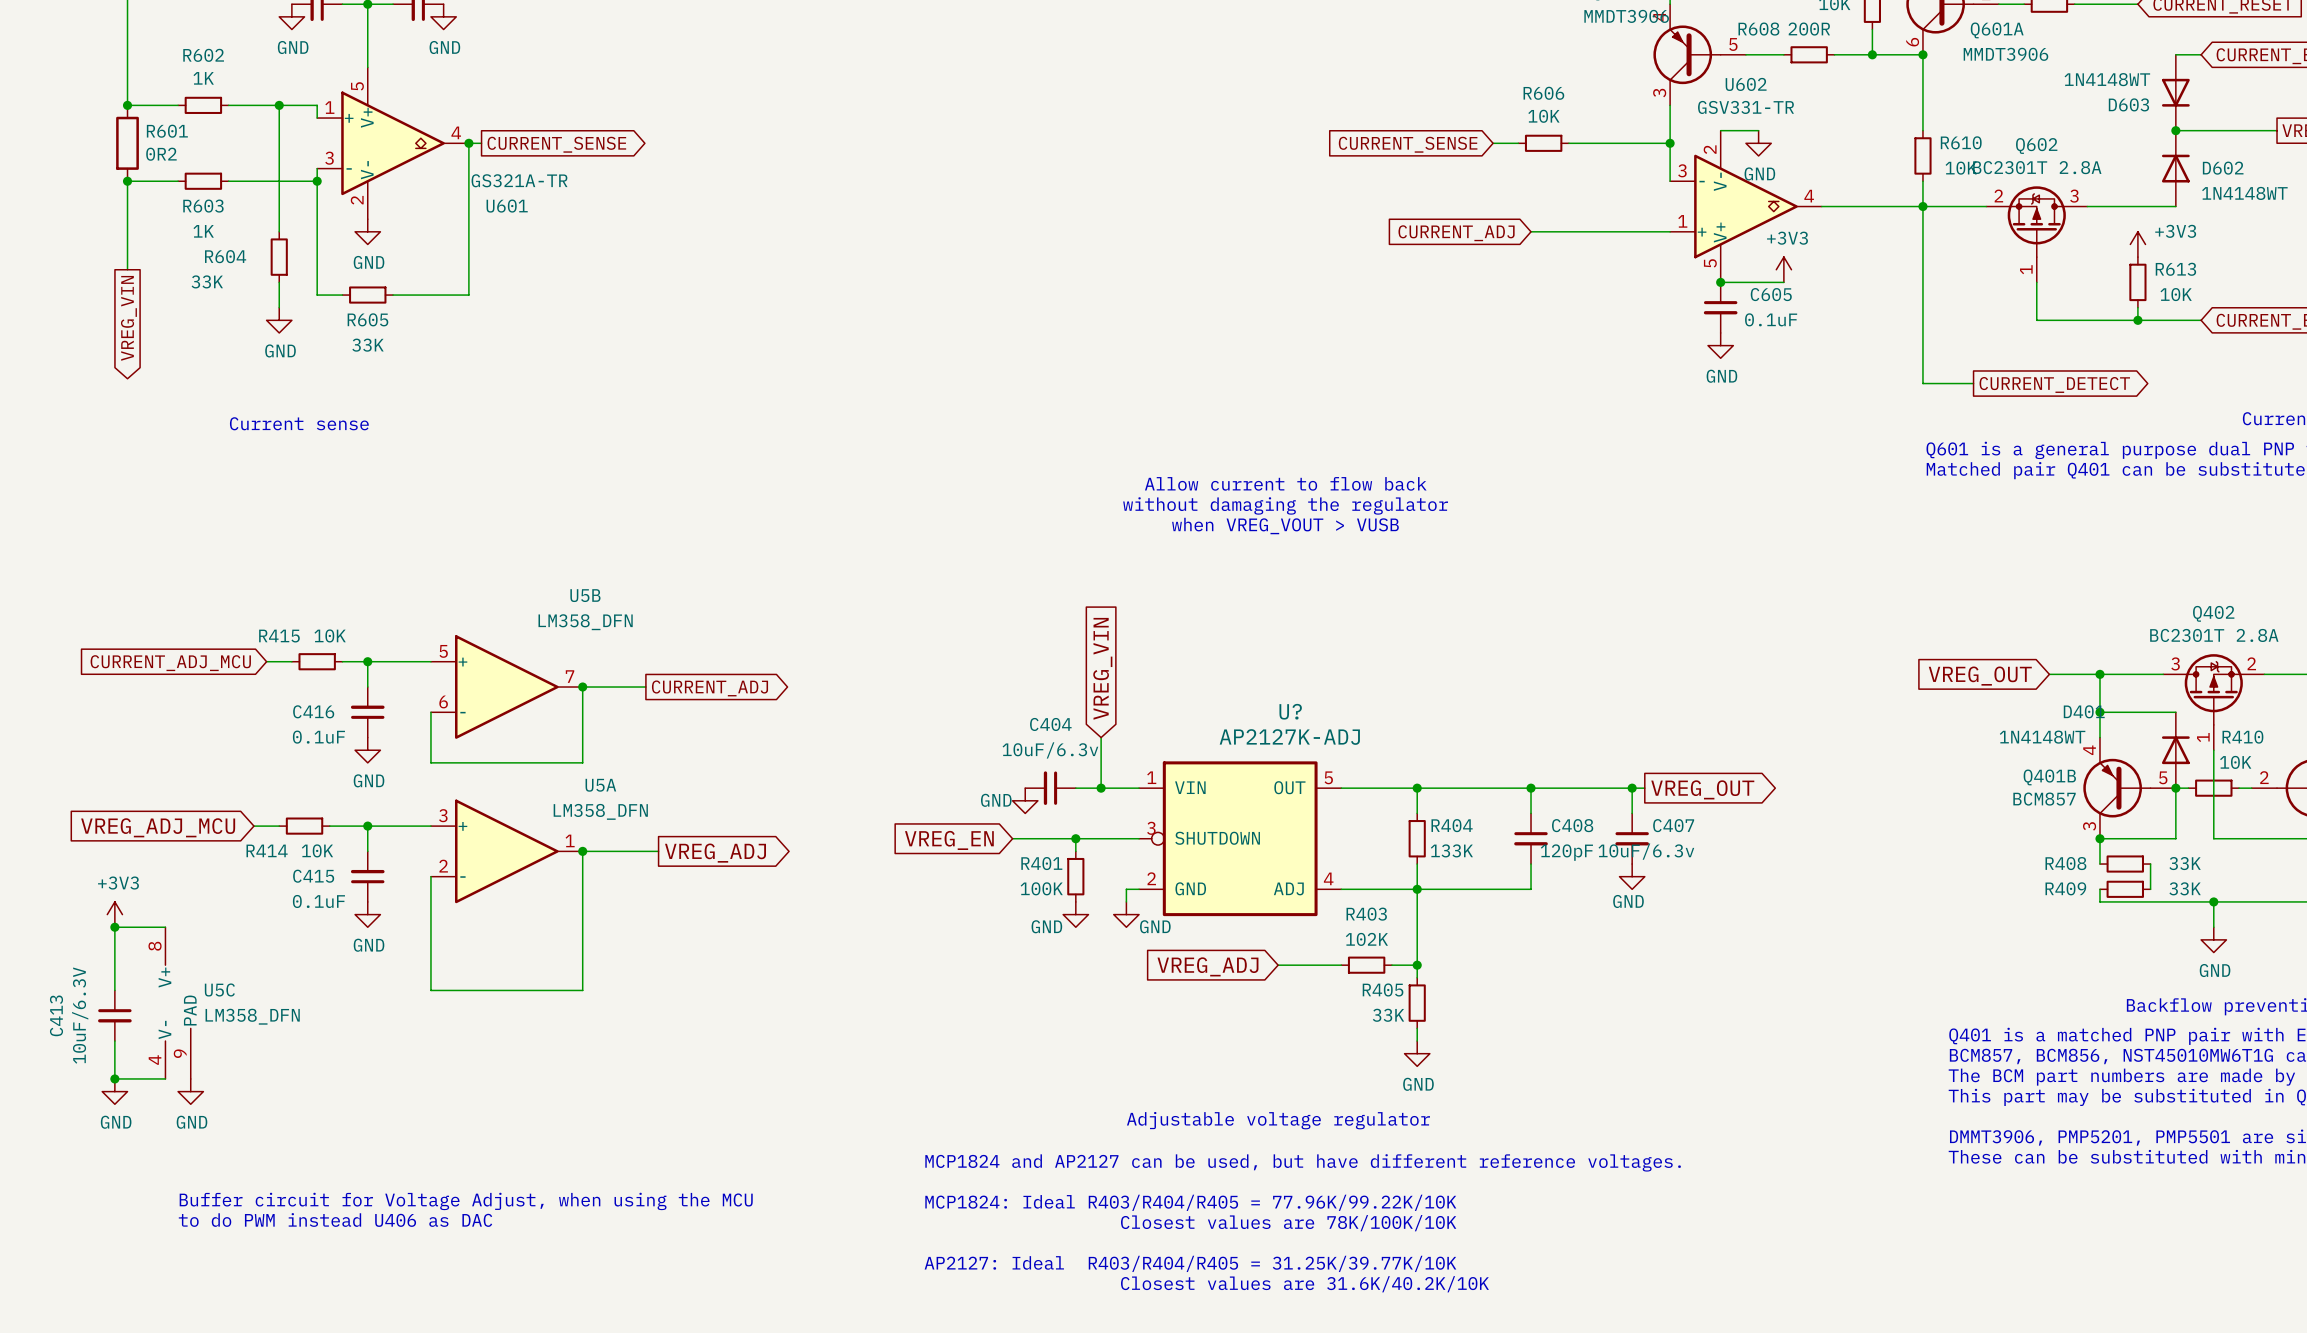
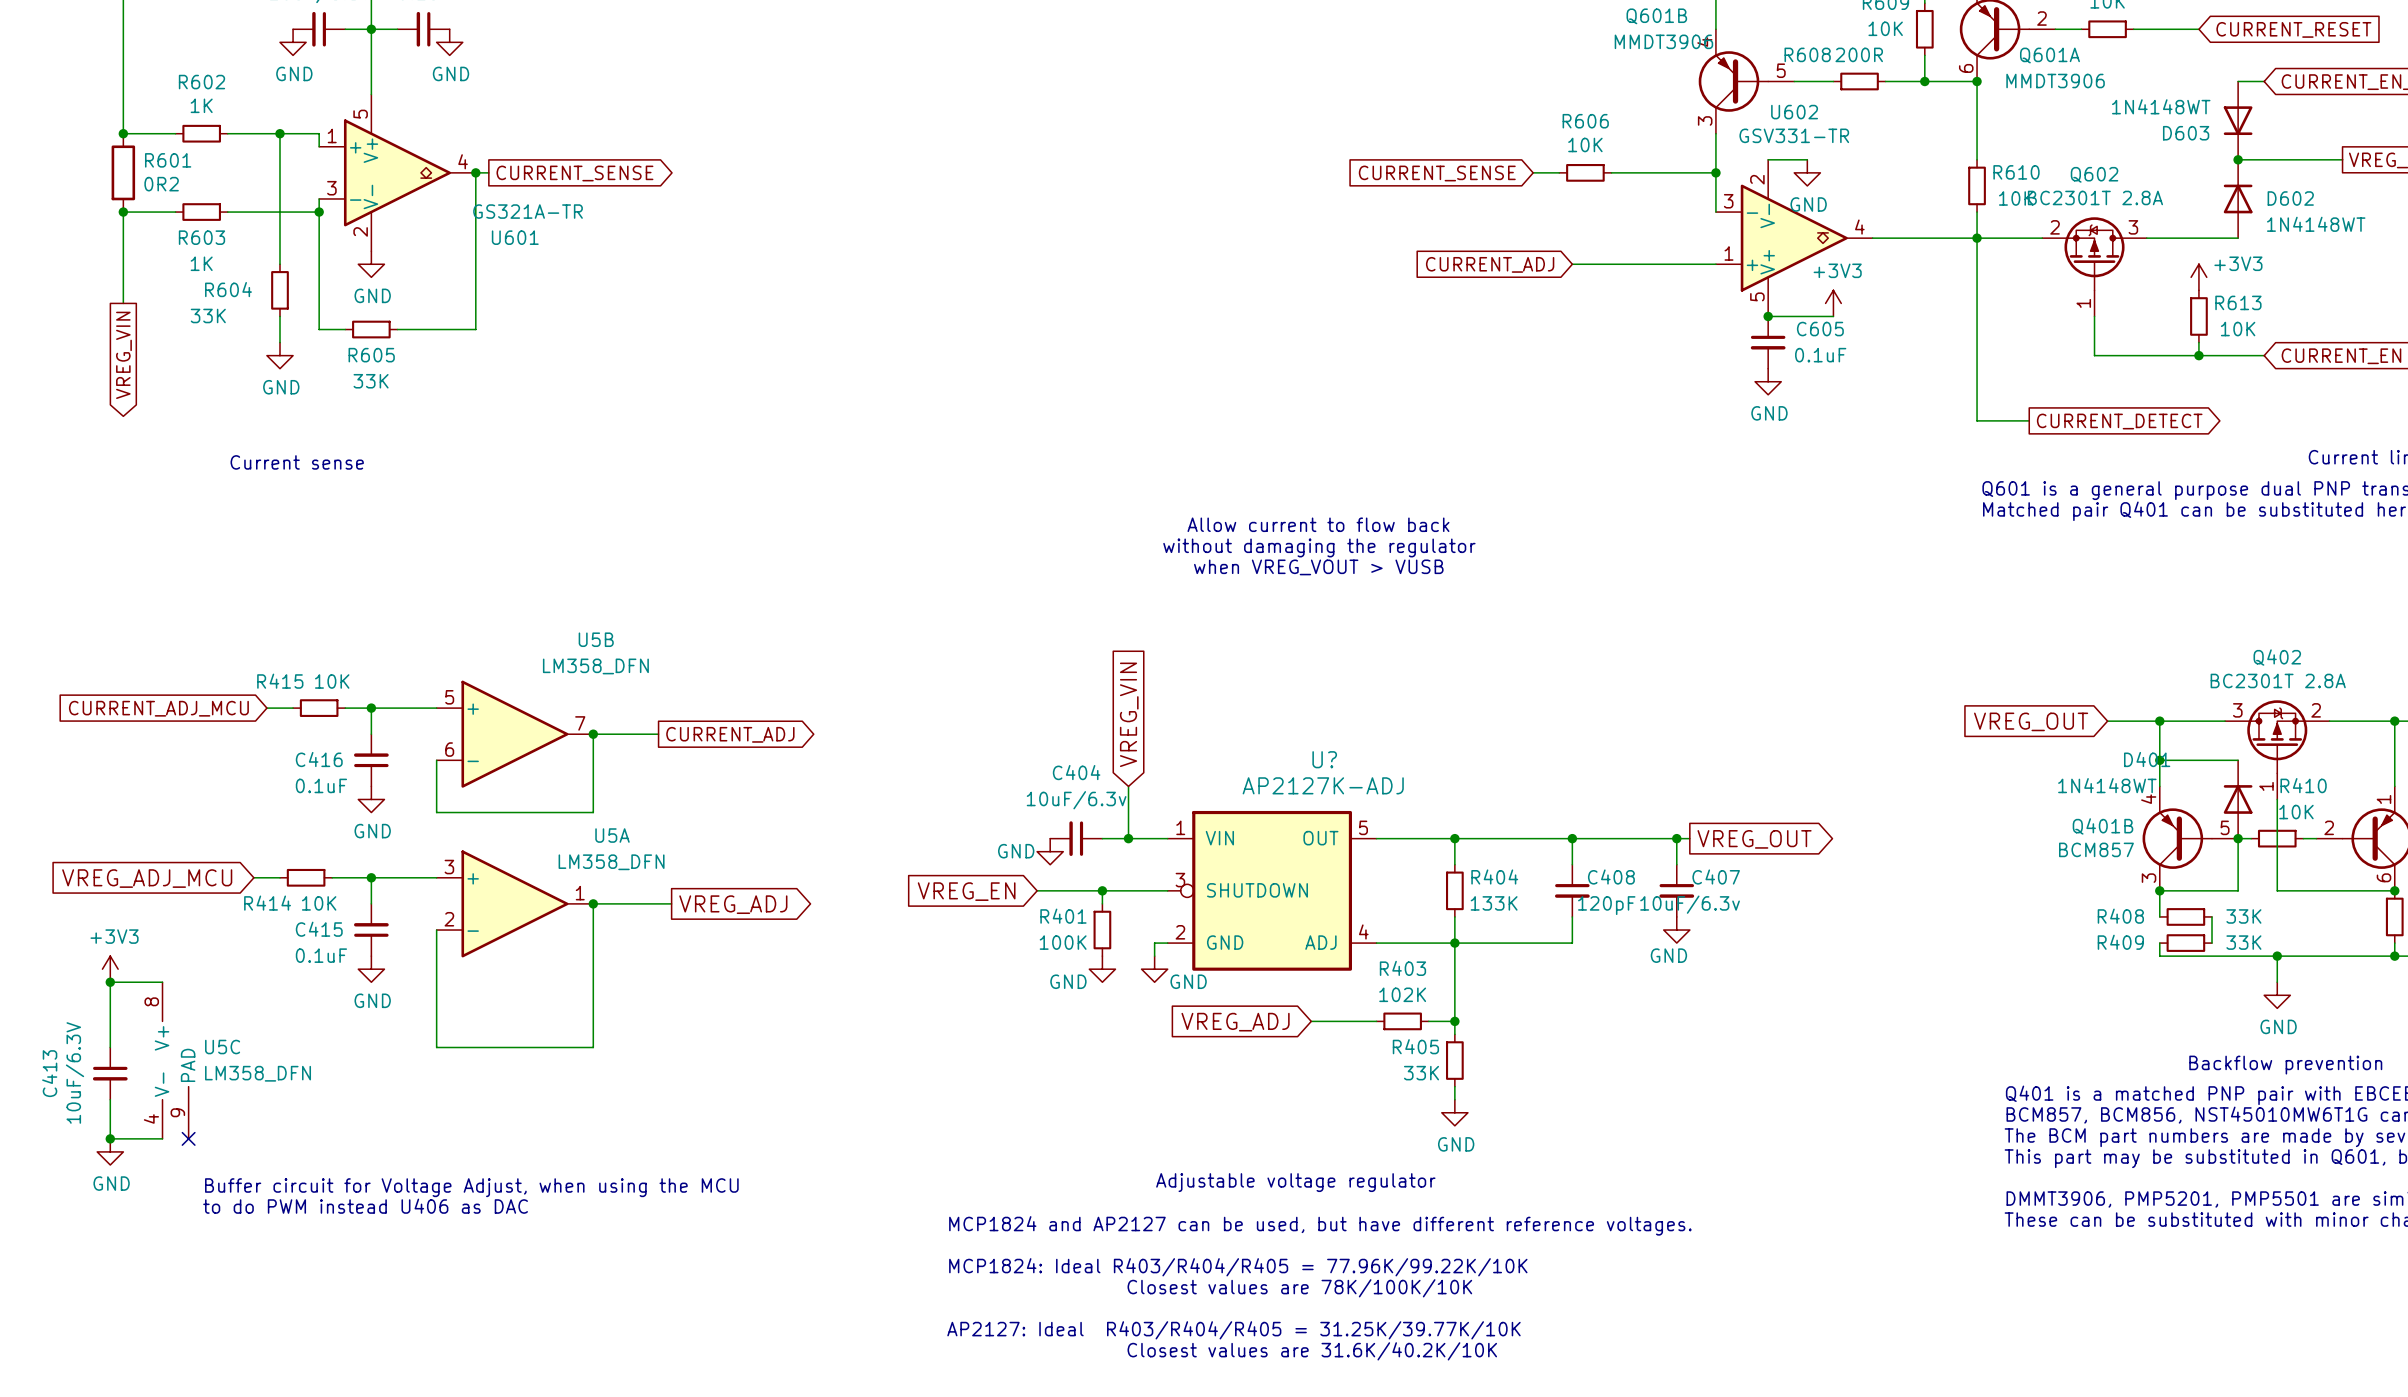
no-connect mark: none -> (188, 1138)
power symbol: GND (190, 1091) -> none
text position: Buffer circuit for Voltage Adjust, when using the MCU (466, 1201) -> Buffer circuit for Voltage Adjust, when using the MCU (471, 1187)
text position: to do PWM instead U406 as DAC (335, 1220) -> to do PWM instead U406 as DAC (365, 1206)

